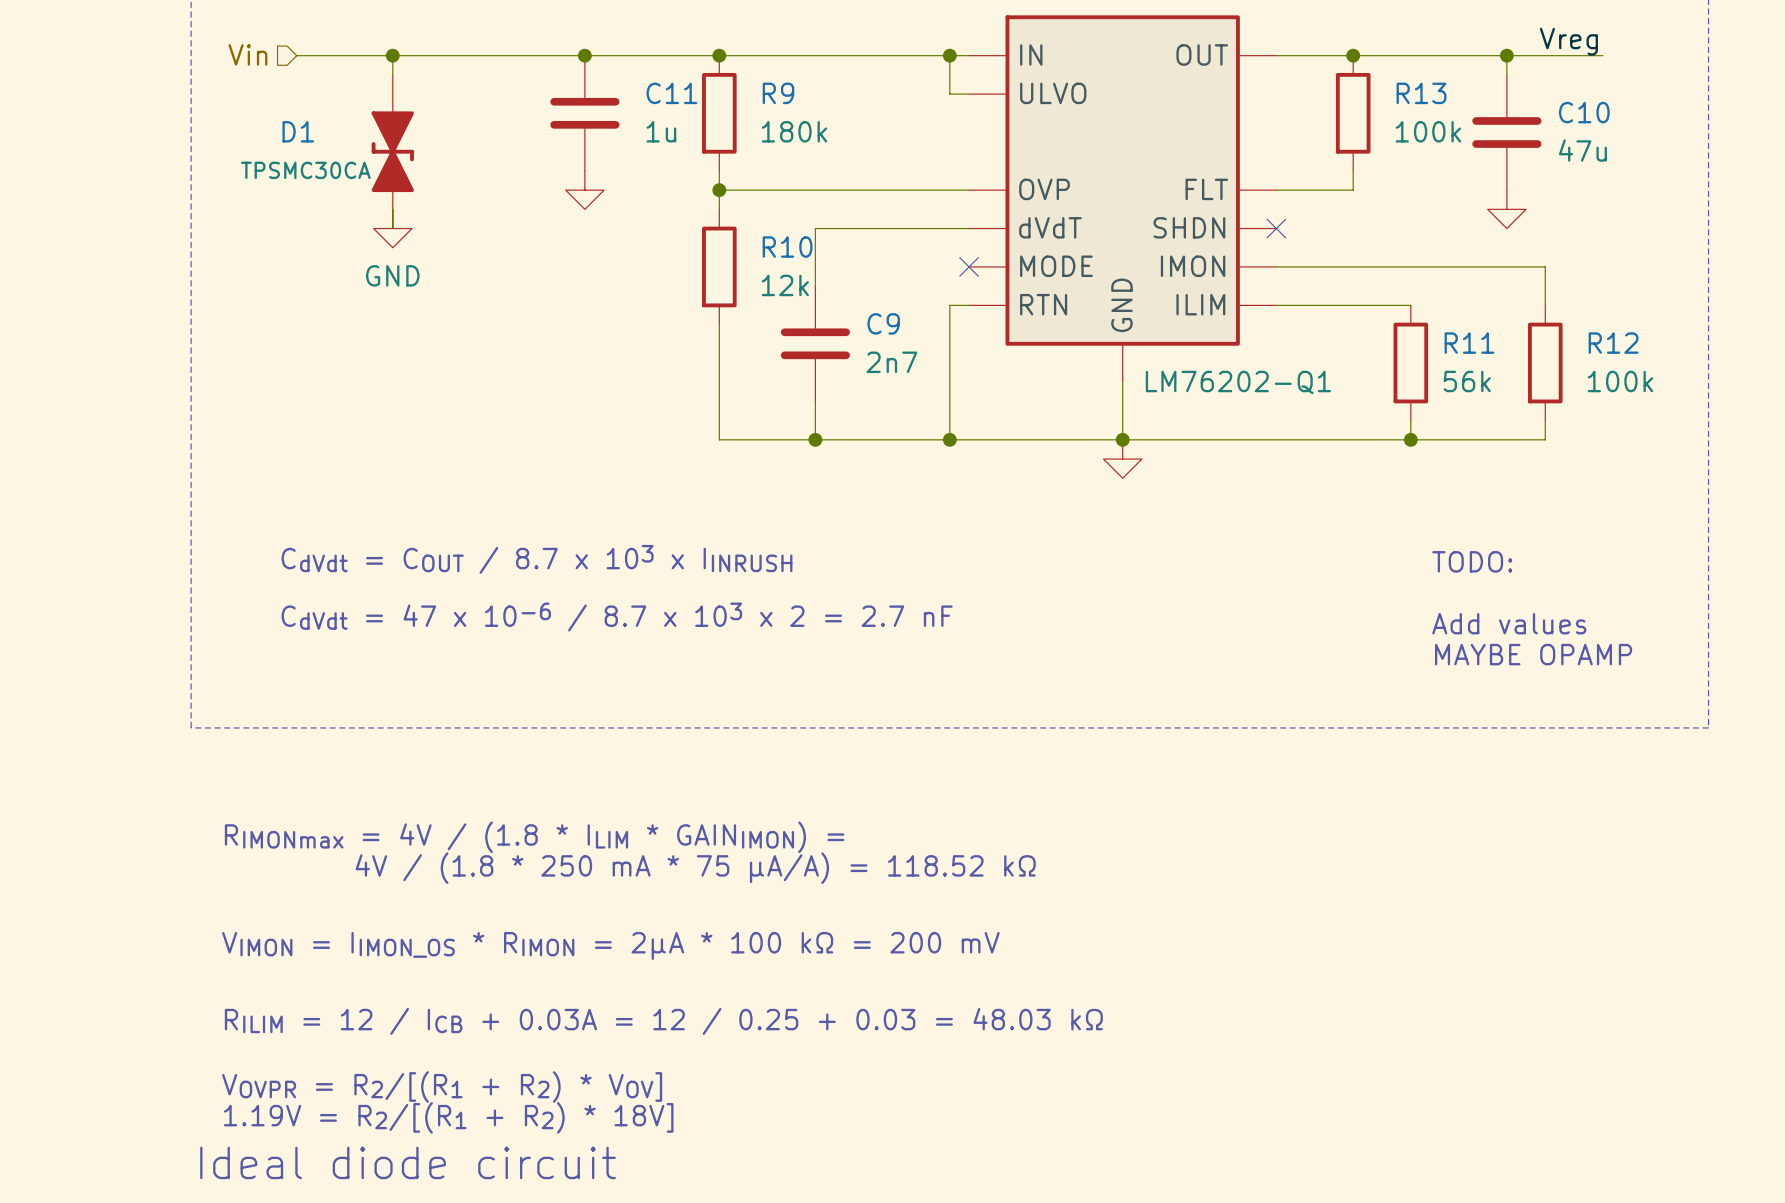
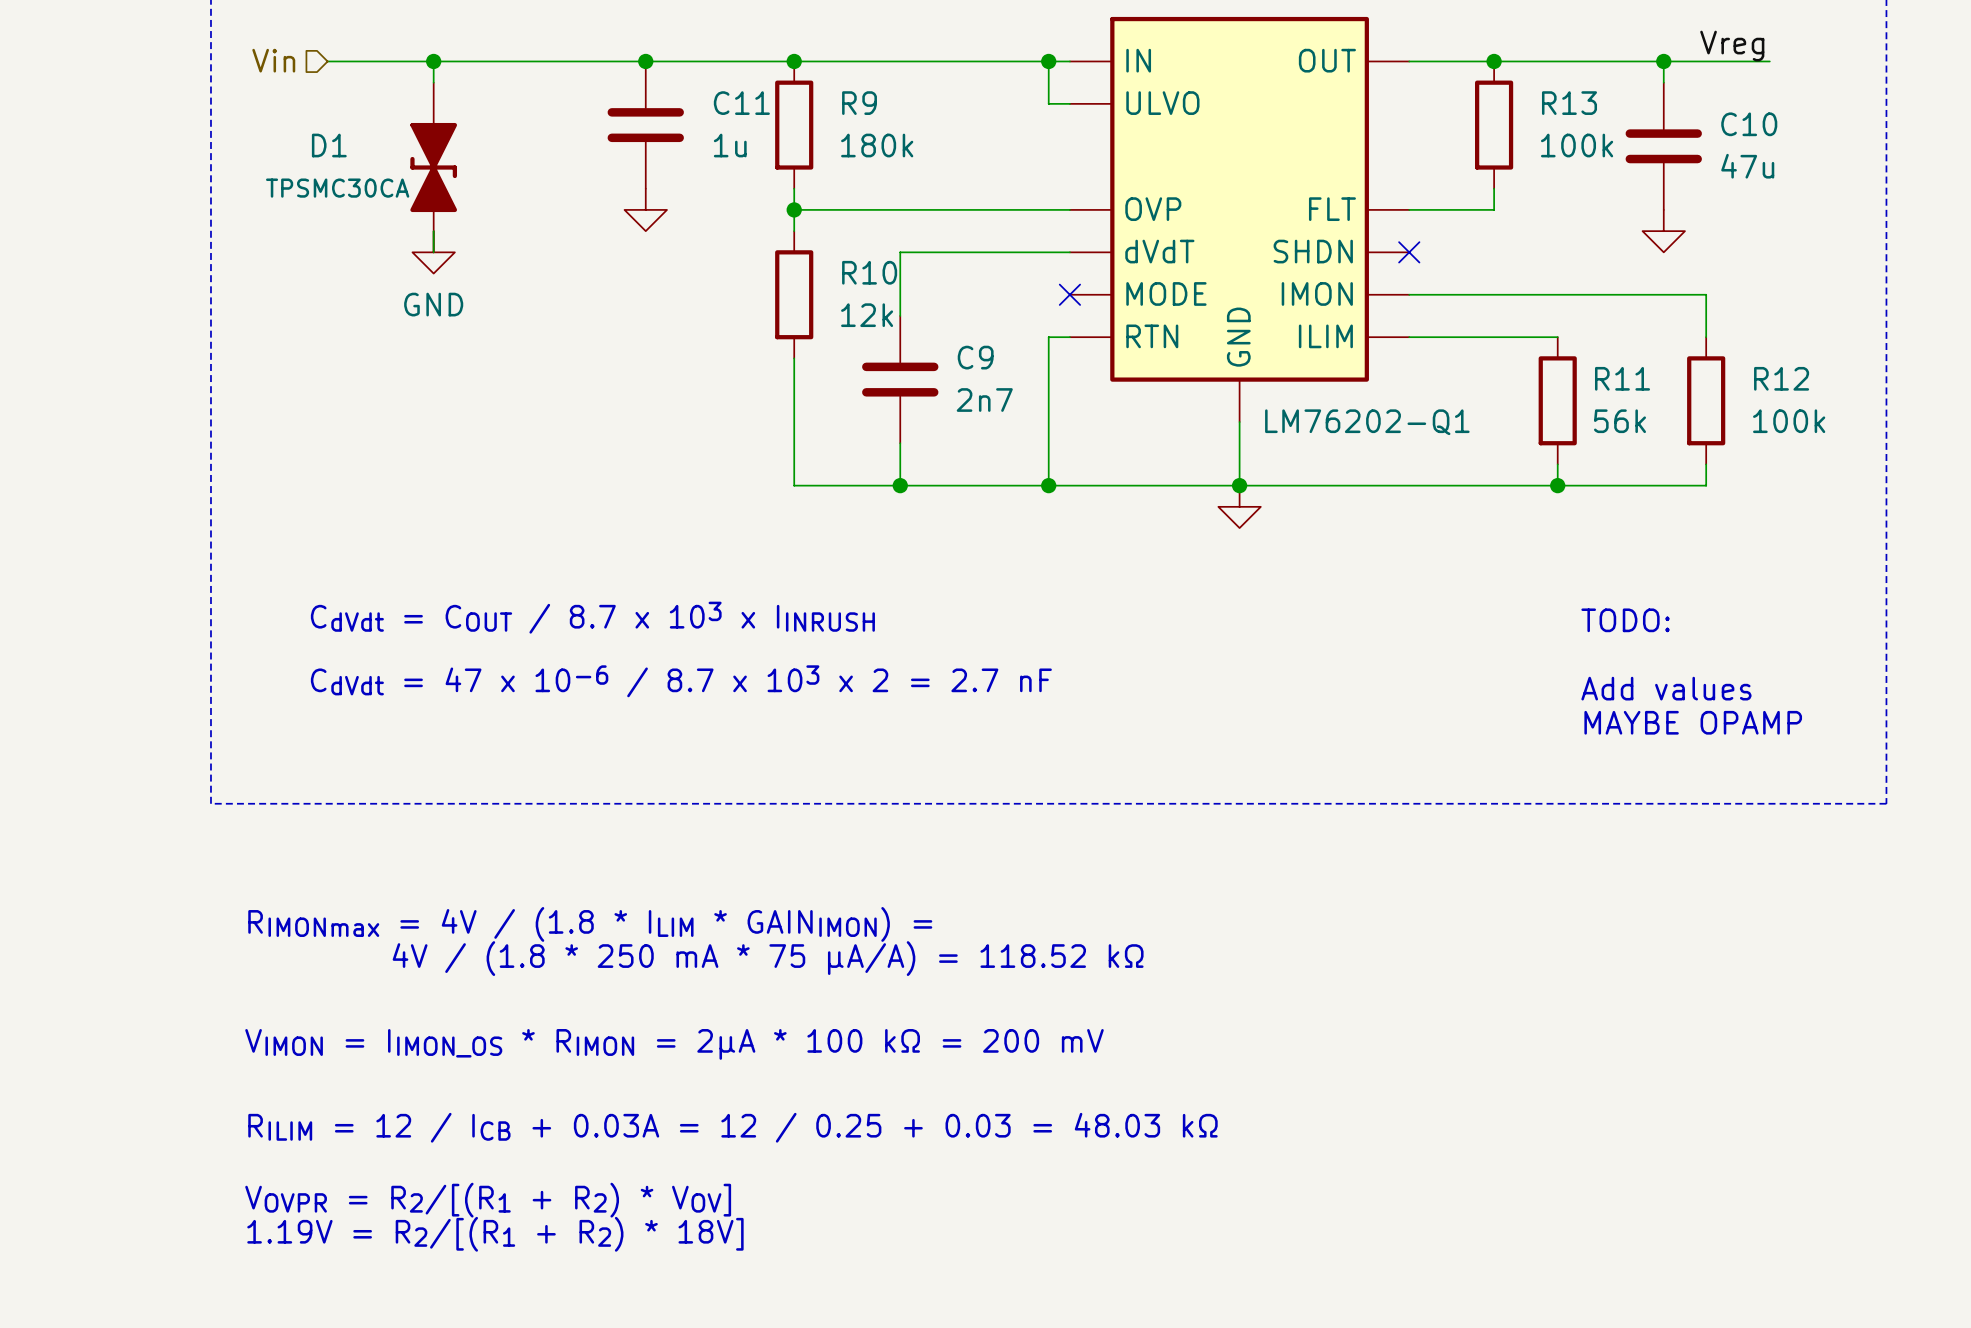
text: Ideal diode circuit (408, 1162) -> none

